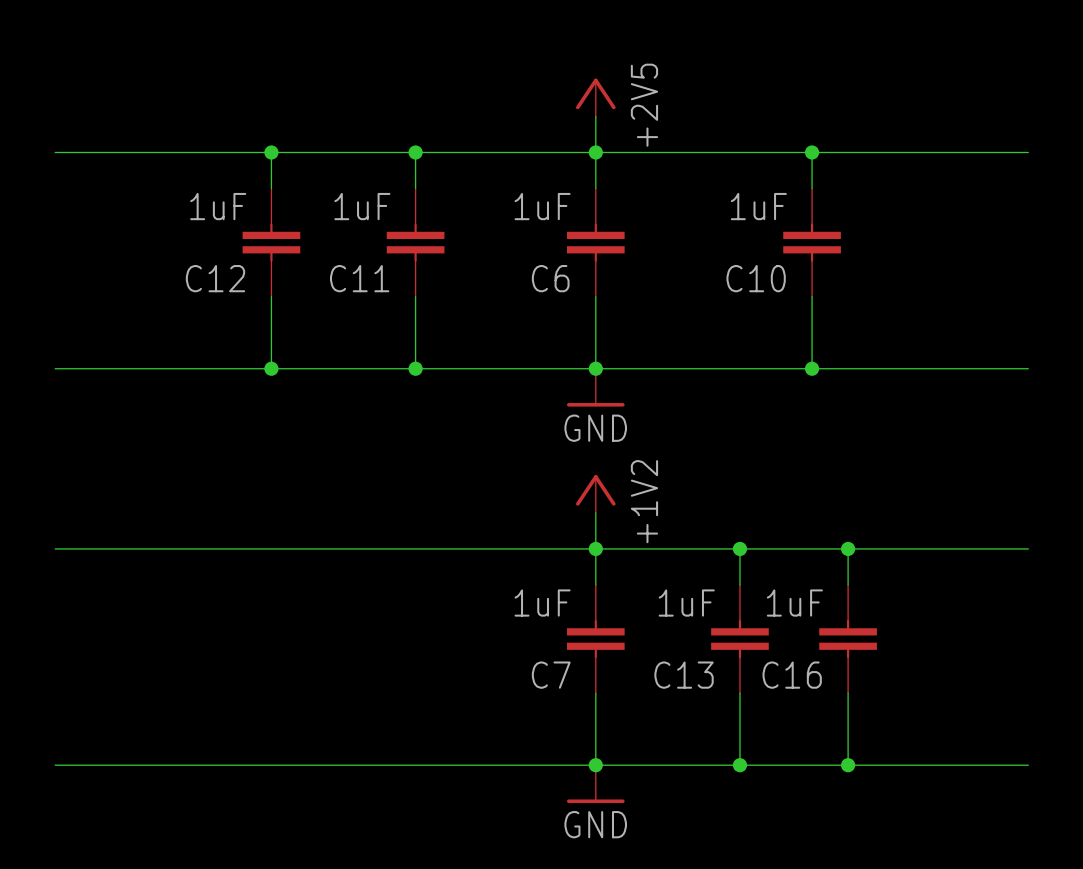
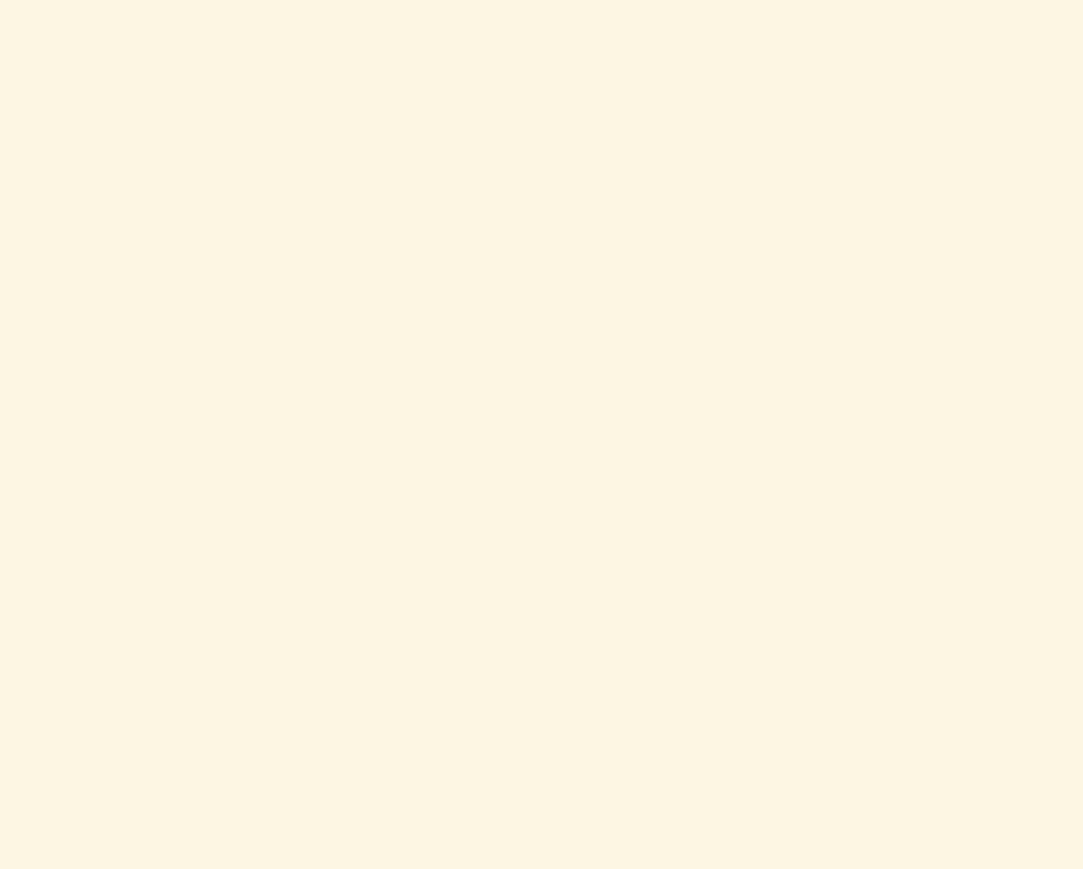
power symbol: +2V5 (595, 97) -> none
wire: (595, 116) (595, 188) -> none
wire: (55, 152) (1028, 152) -> none
wire: (271, 152) (271, 188) -> none
junction: (271, 152) -> none
wire: (415, 152) (415, 188) -> none
junction: (415, 152) -> none
junction: (595, 152) -> none
wire: (812, 152) (812, 188) -> none
junction: (812, 152) -> none
C12: 1uF (271, 242) -> none
C11: 1uF (415, 242) -> none
C6: 1uF (595, 242) -> none
C10: 1uF (812, 242) -> none
wire: (271, 296) (271, 368) -> none
wire: (415, 296) (415, 368) -> none
wire: (595, 296) (595, 368) -> none
wire: (812, 296) (812, 368) -> none
wire: (55, 368) (1028, 368) -> none
junction: (271, 368) -> none
junction: (415, 368) -> none
junction: (595, 368) -> none
junction: (812, 368) -> none
power symbol: GND (595, 387) -> none
power symbol: +1V2 (595, 493) -> none
wire: (595, 512) (595, 584) -> none
wire: (55, 548) (1028, 548) -> none
junction: (595, 548) -> none
wire: (739, 548) (739, 584) -> none
junction: (739, 548) -> none
wire: (848, 548) (848, 584) -> none
junction: (848, 548) -> none
C7: 1uF (595, 639) -> none
C13: 1uF (739, 639) -> none
C16: 1uF (848, 639) -> none
wire: (595, 693) (595, 765) -> none
wire: (739, 693) (739, 765) -> none
wire: (848, 693) (848, 765) -> none
wire: (55, 765) (1028, 765) -> none
junction: (595, 765) -> none
junction: (739, 765) -> none
junction: (848, 765) -> none
power symbol: GND (595, 784) -> none

